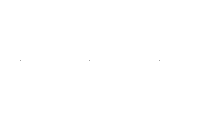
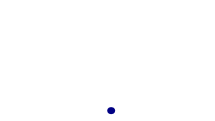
line: none -> (110, 110) (111, 110)

